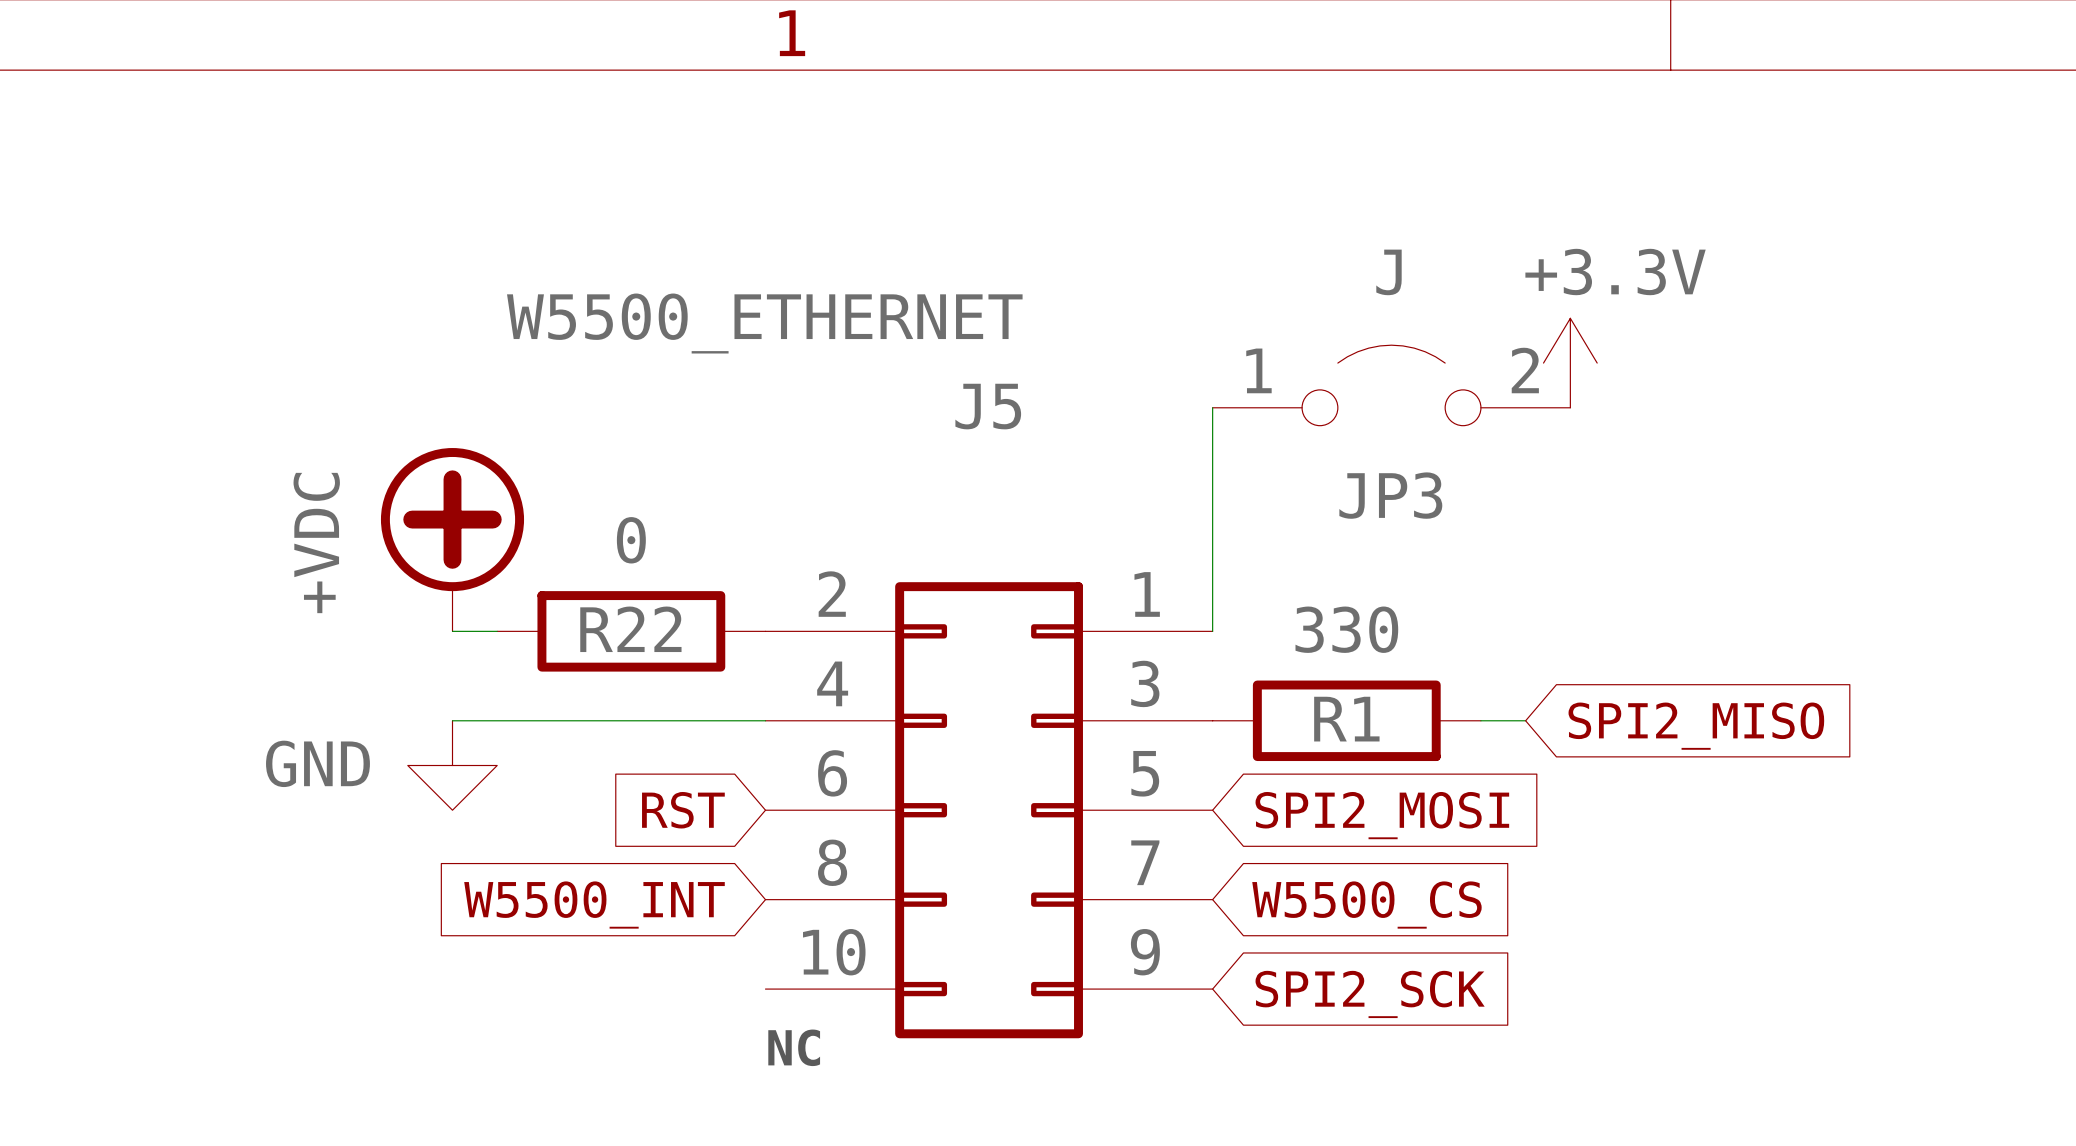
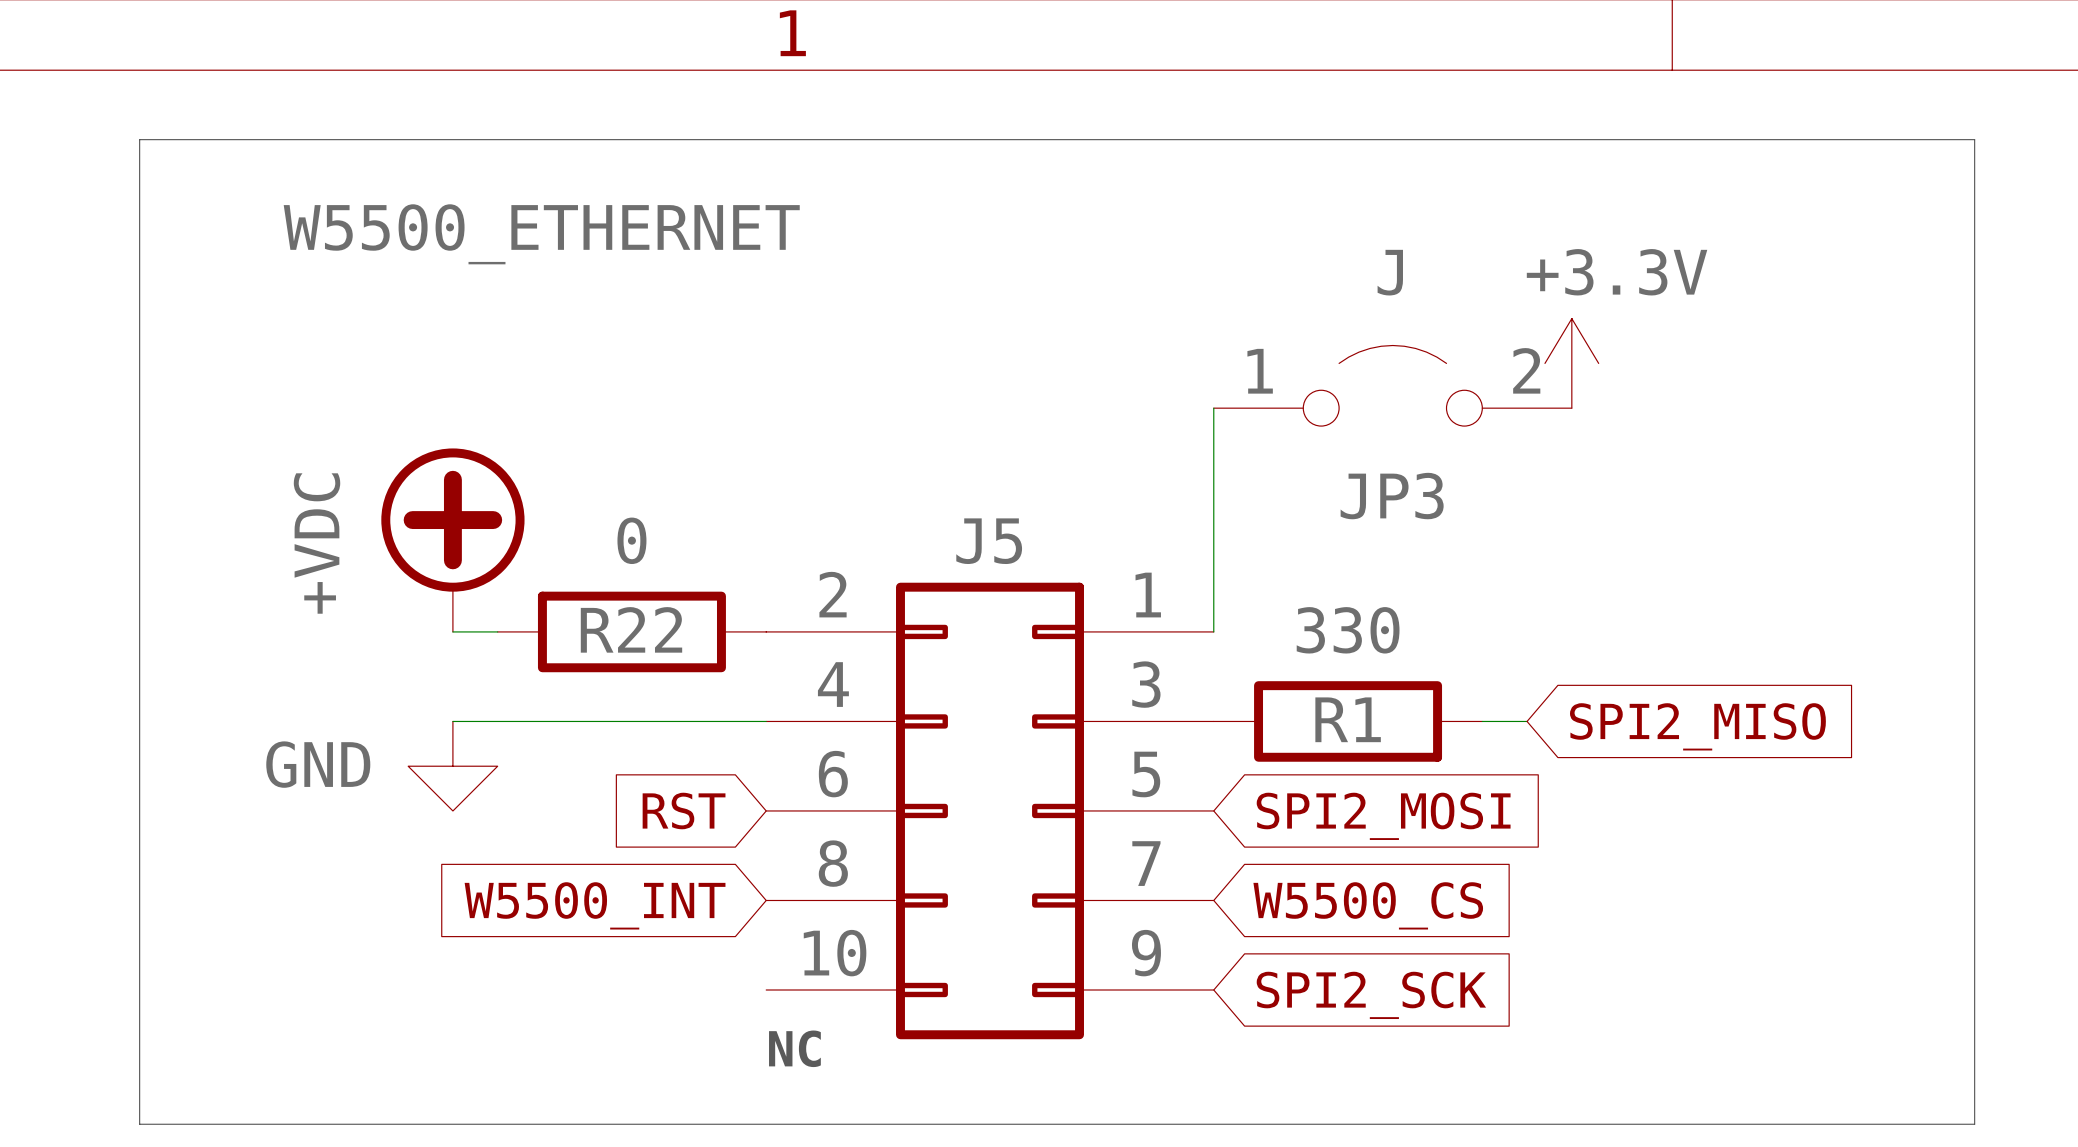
line: none -> (139, 139) (1974, 139) (1974, 1124) (139, 1124) (139, 139)
J5 value position: W5500_ETHERNET (764, 323) -> W5500_ETHERNET (541, 234)
J5 name position: J5 (988, 406) -> J5 (989, 541)

